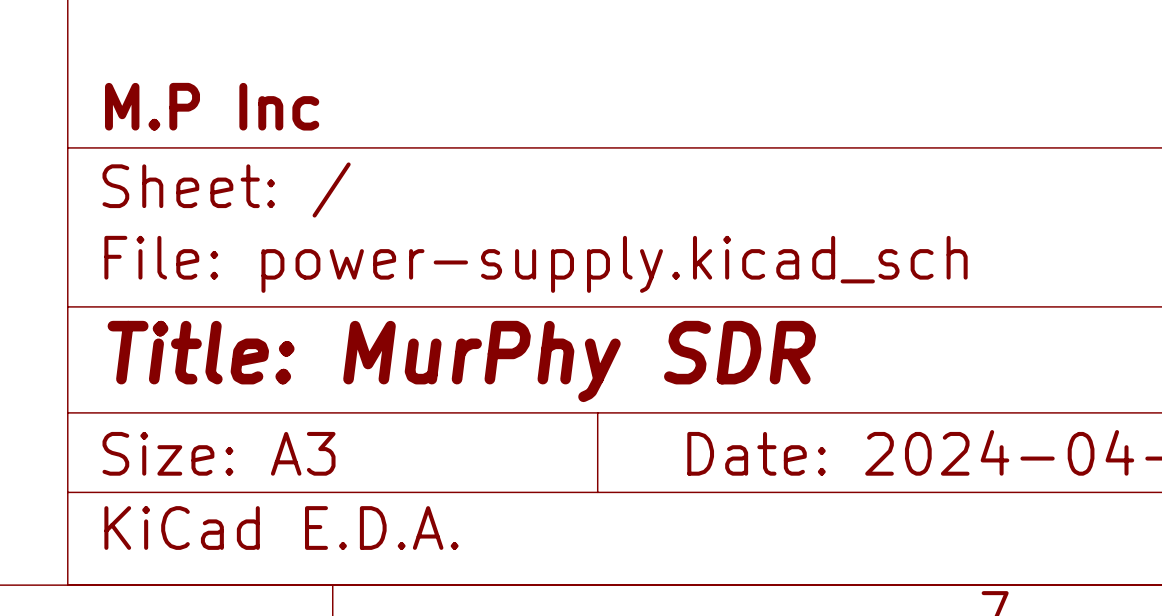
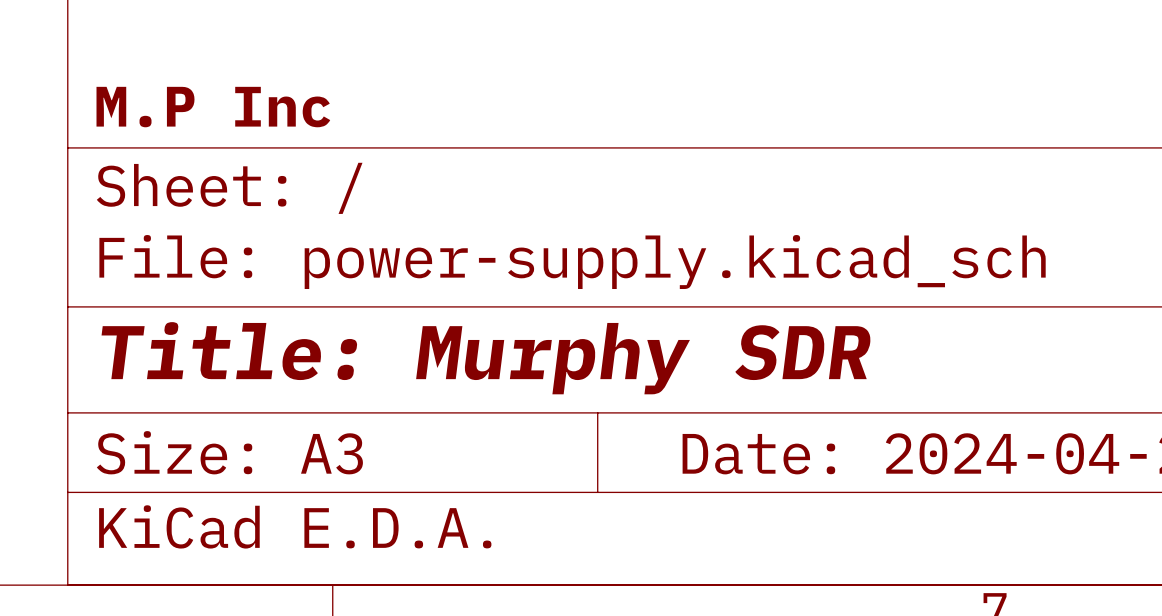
title block: Title: MurPhy SDR (461, 361) -> Title: Murphy SDR (486, 358)

